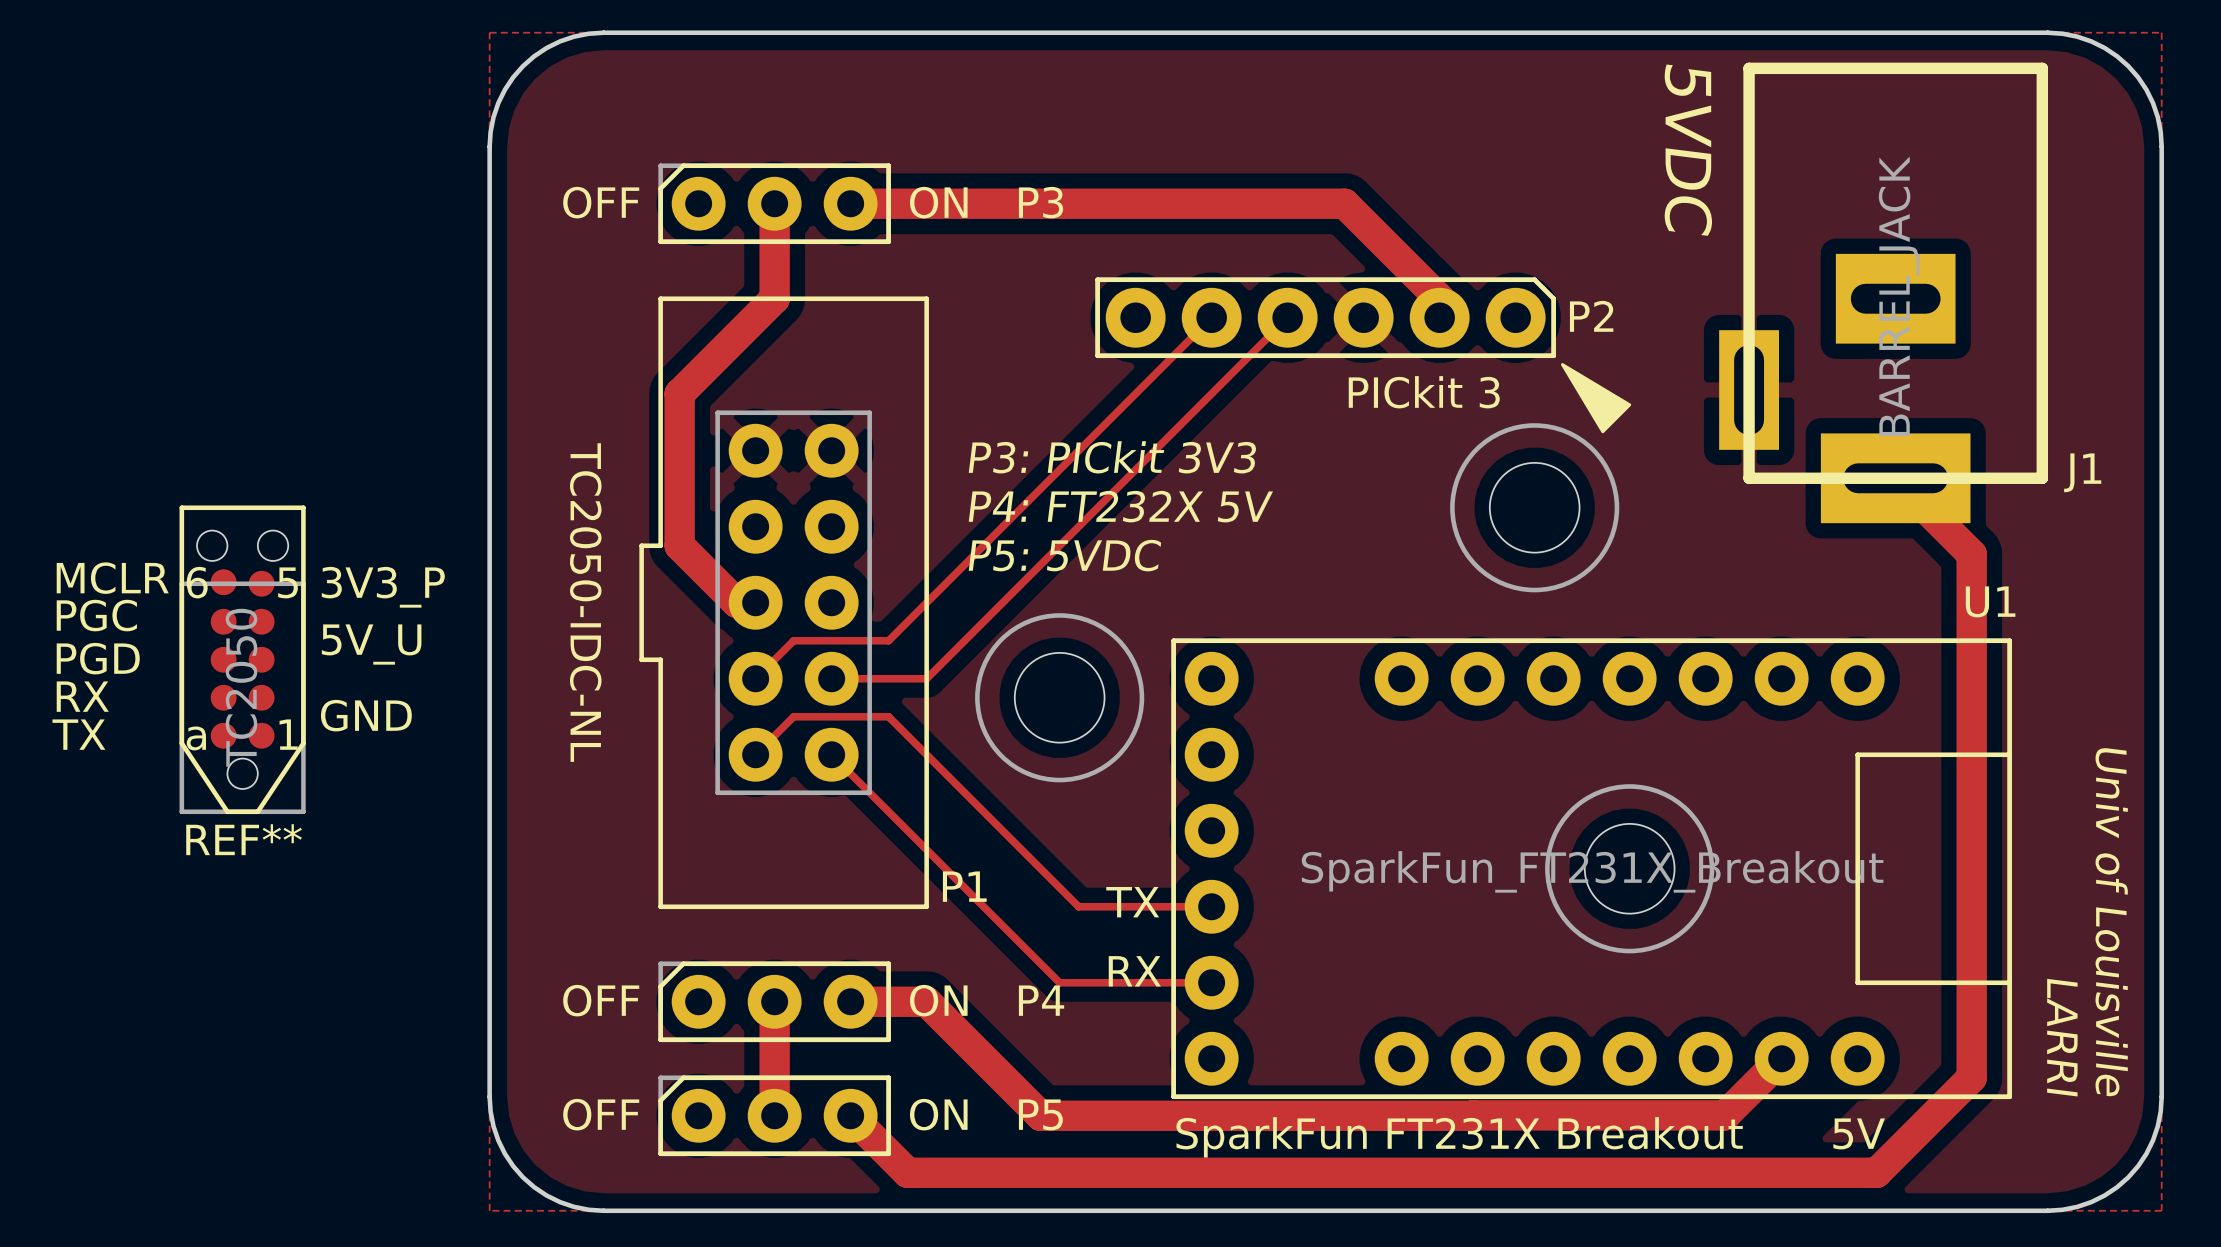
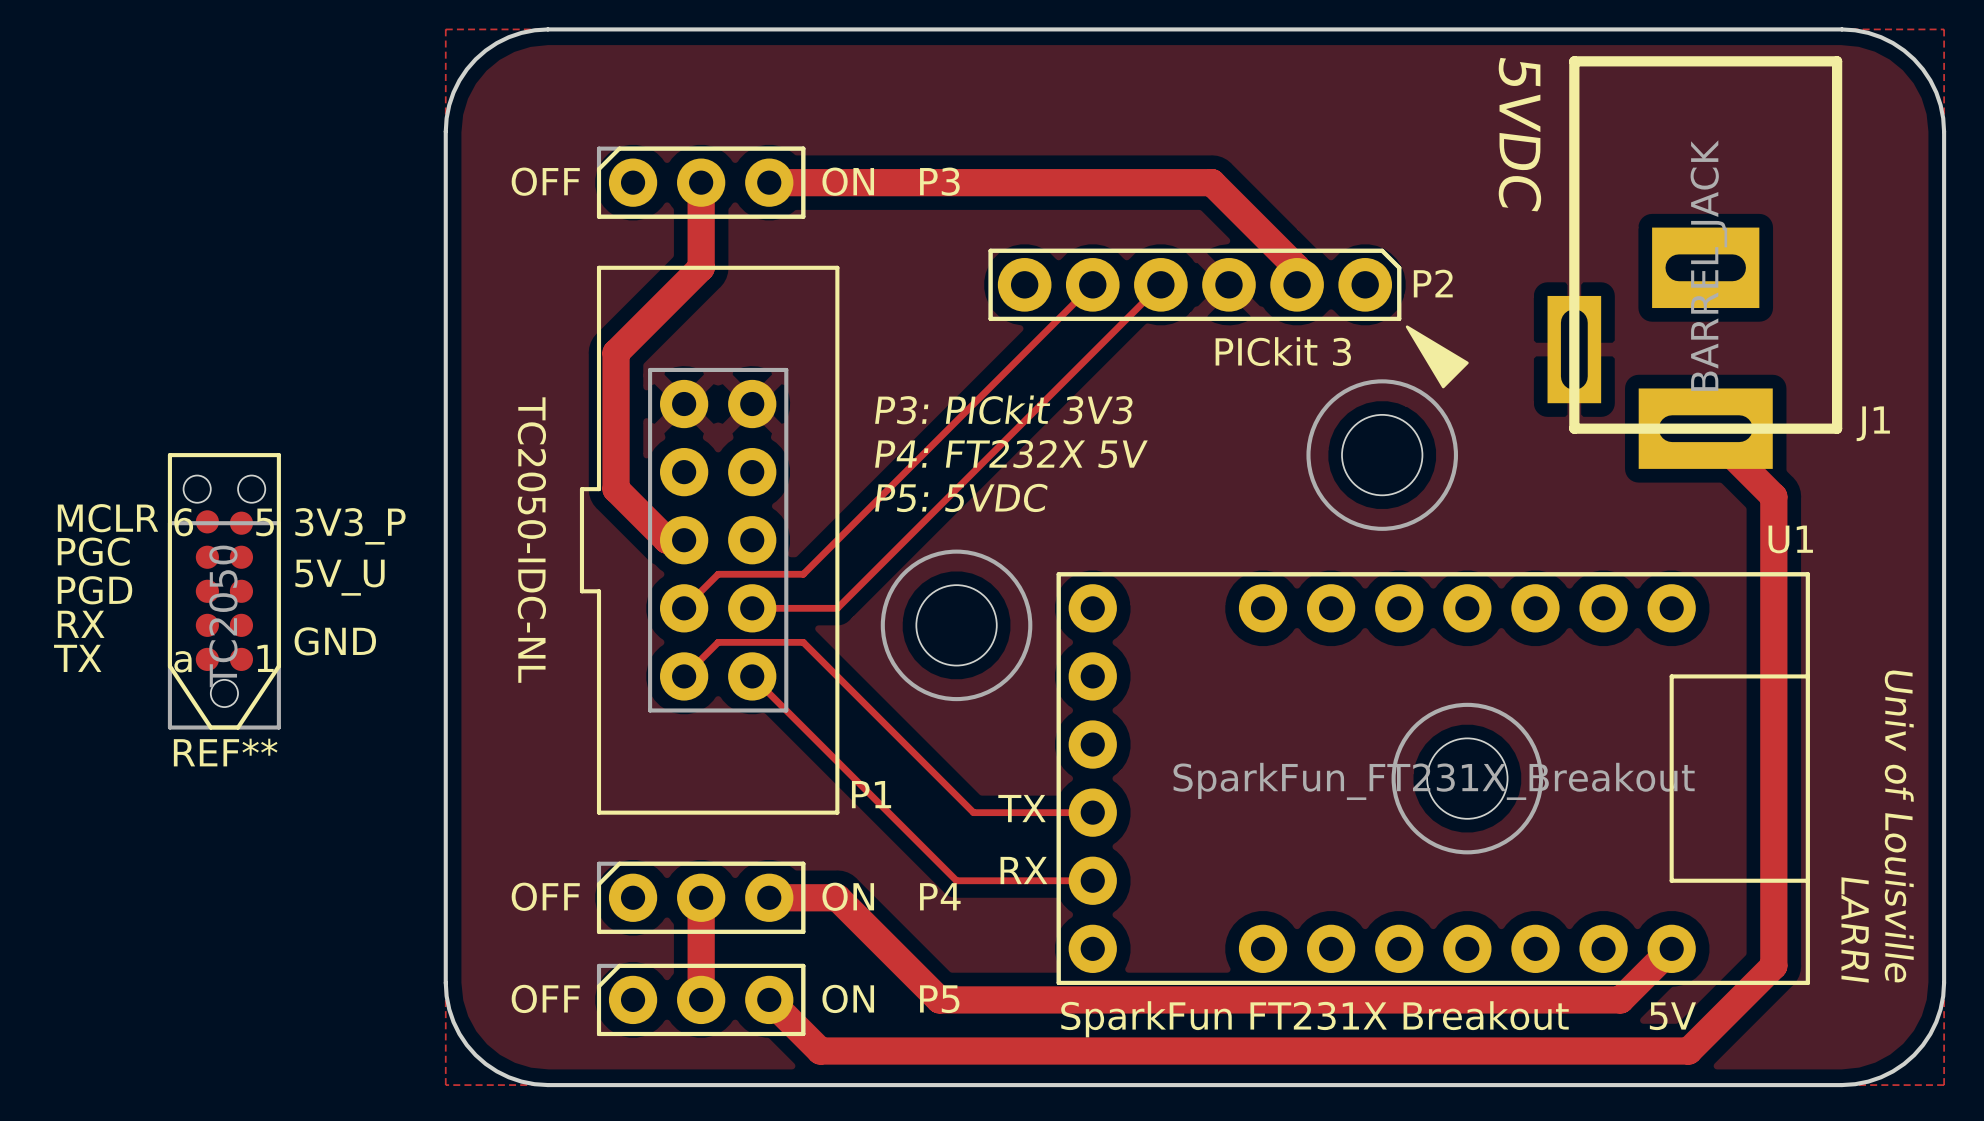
track: (1781, 1058) (1725, 1115) (1473, 1115) -> (1671, 948) (1620, 999) (1326, 999)

